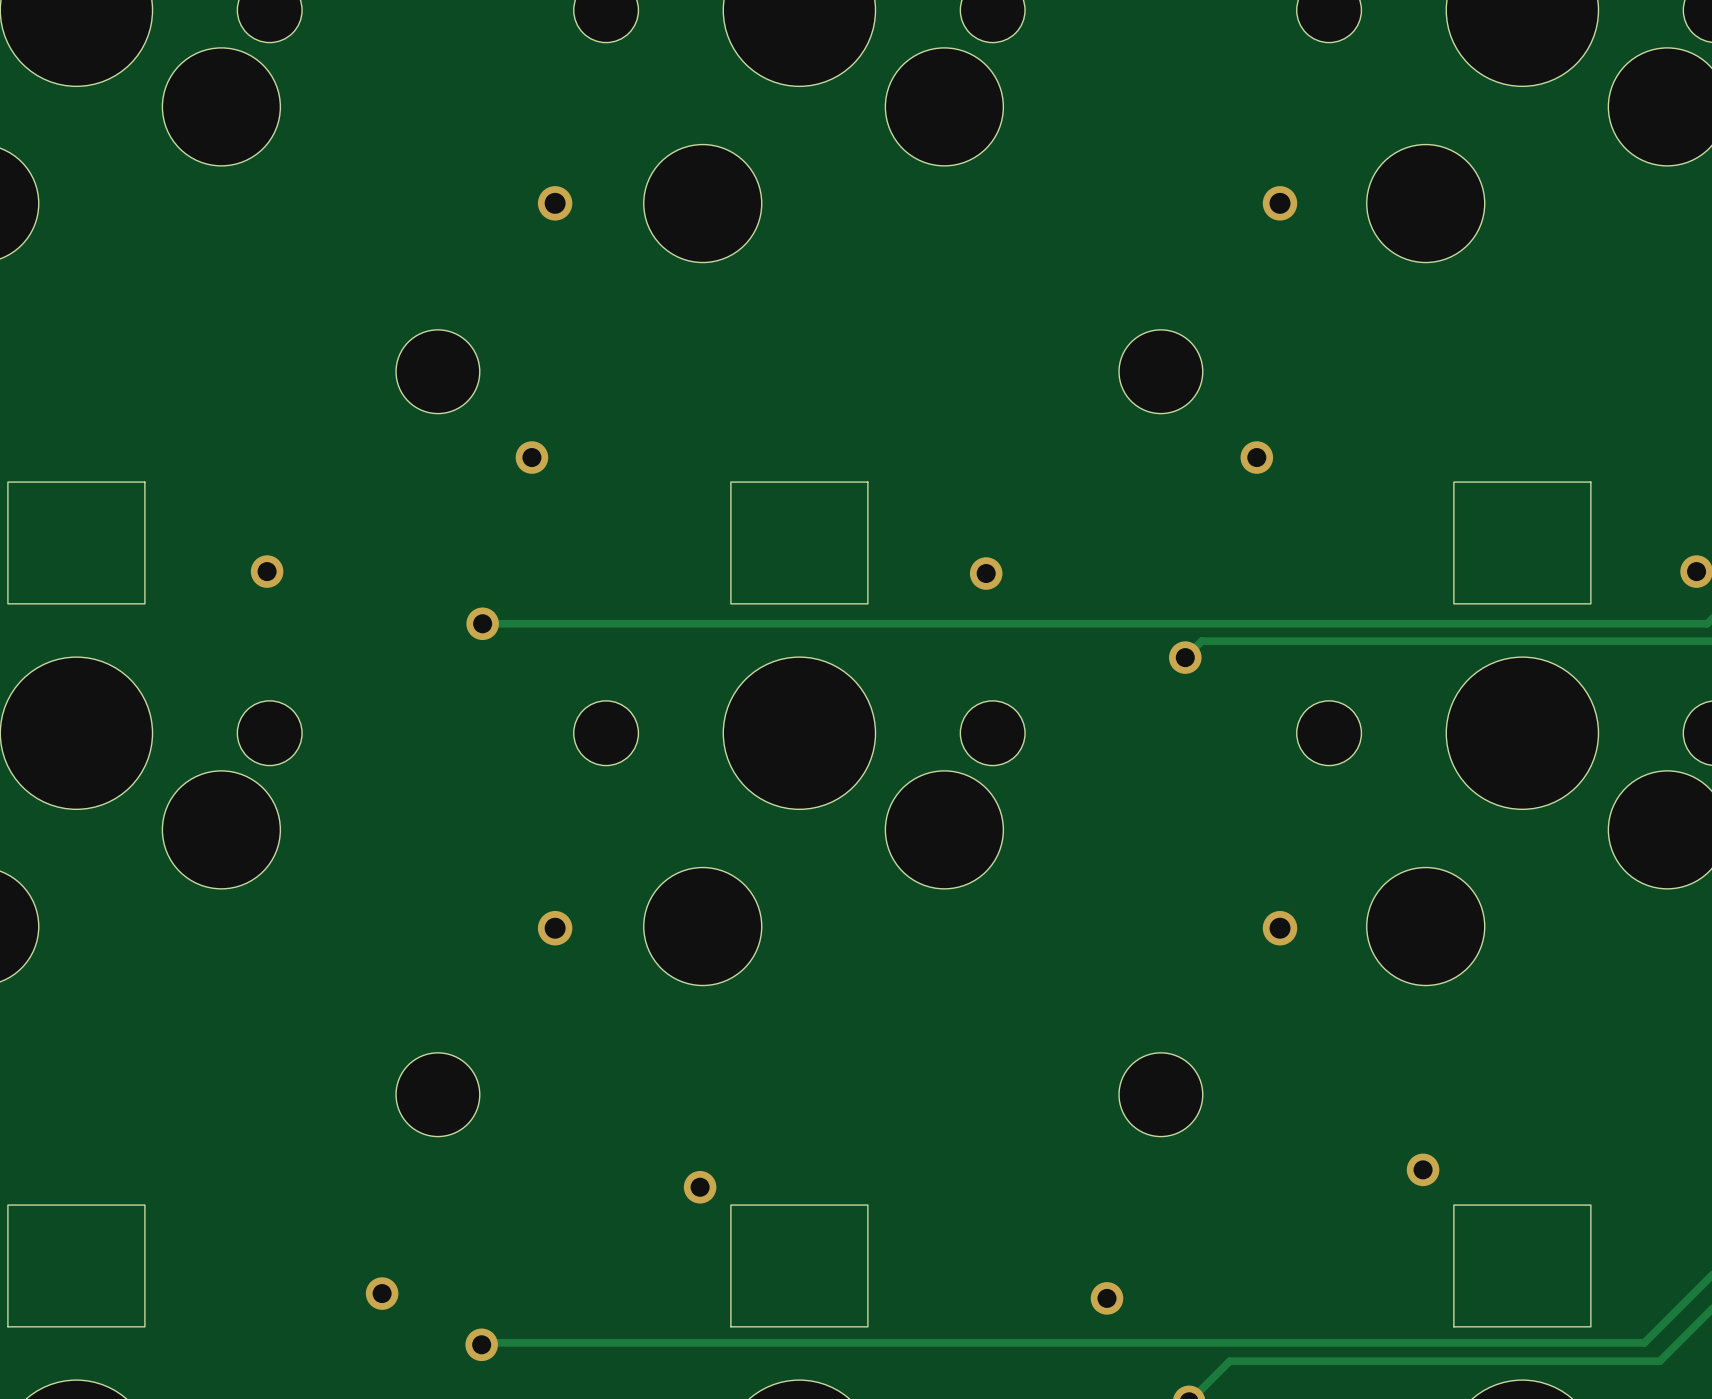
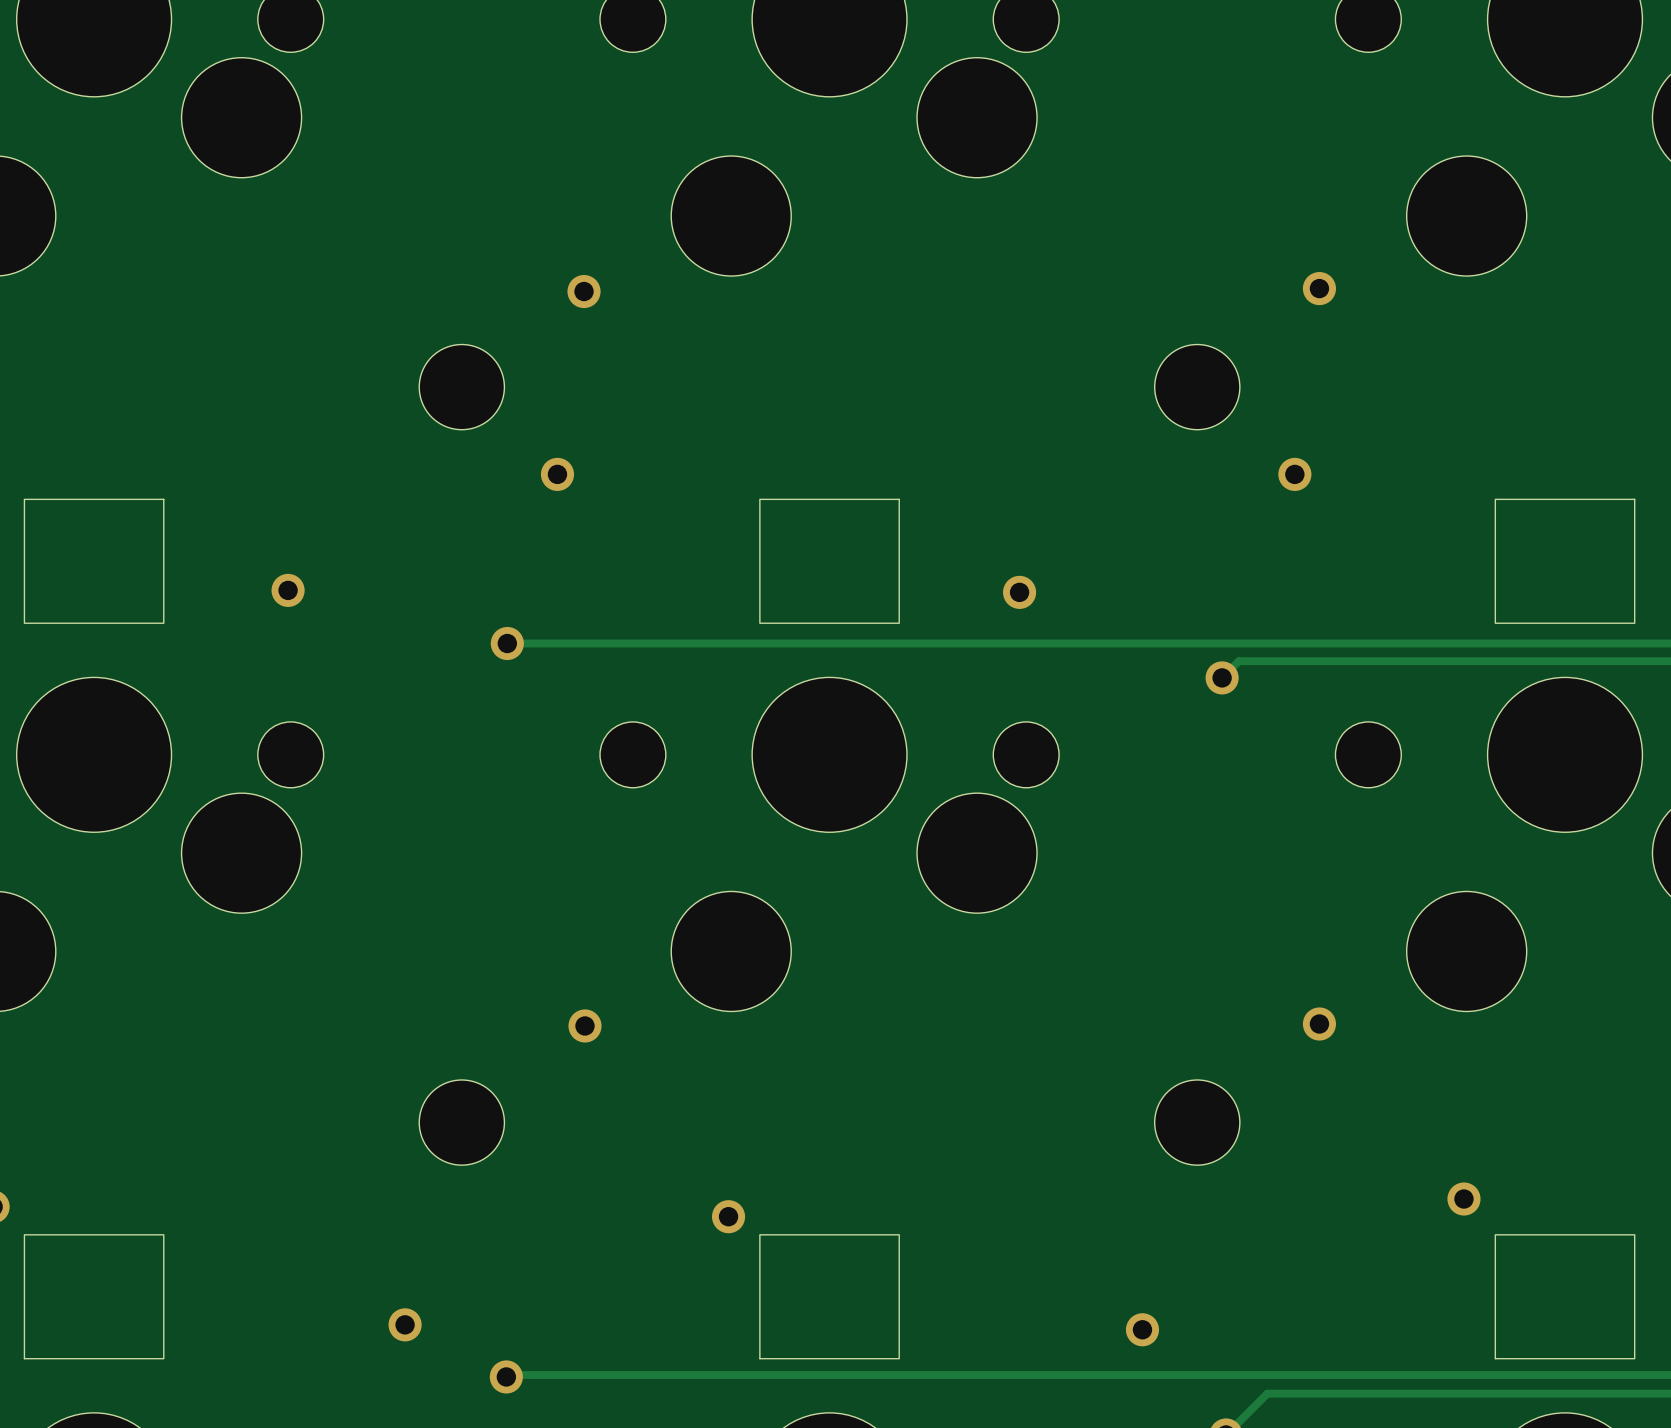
via: (555, 203) -> none
via: (1280, 203) -> none
via: none -> (1319, 288)
via: none -> (584, 291)
via: (555, 928) -> none
via: (1280, 928) -> none
via: none -> (1319, 1024)
via: none -> (585, 1025)

